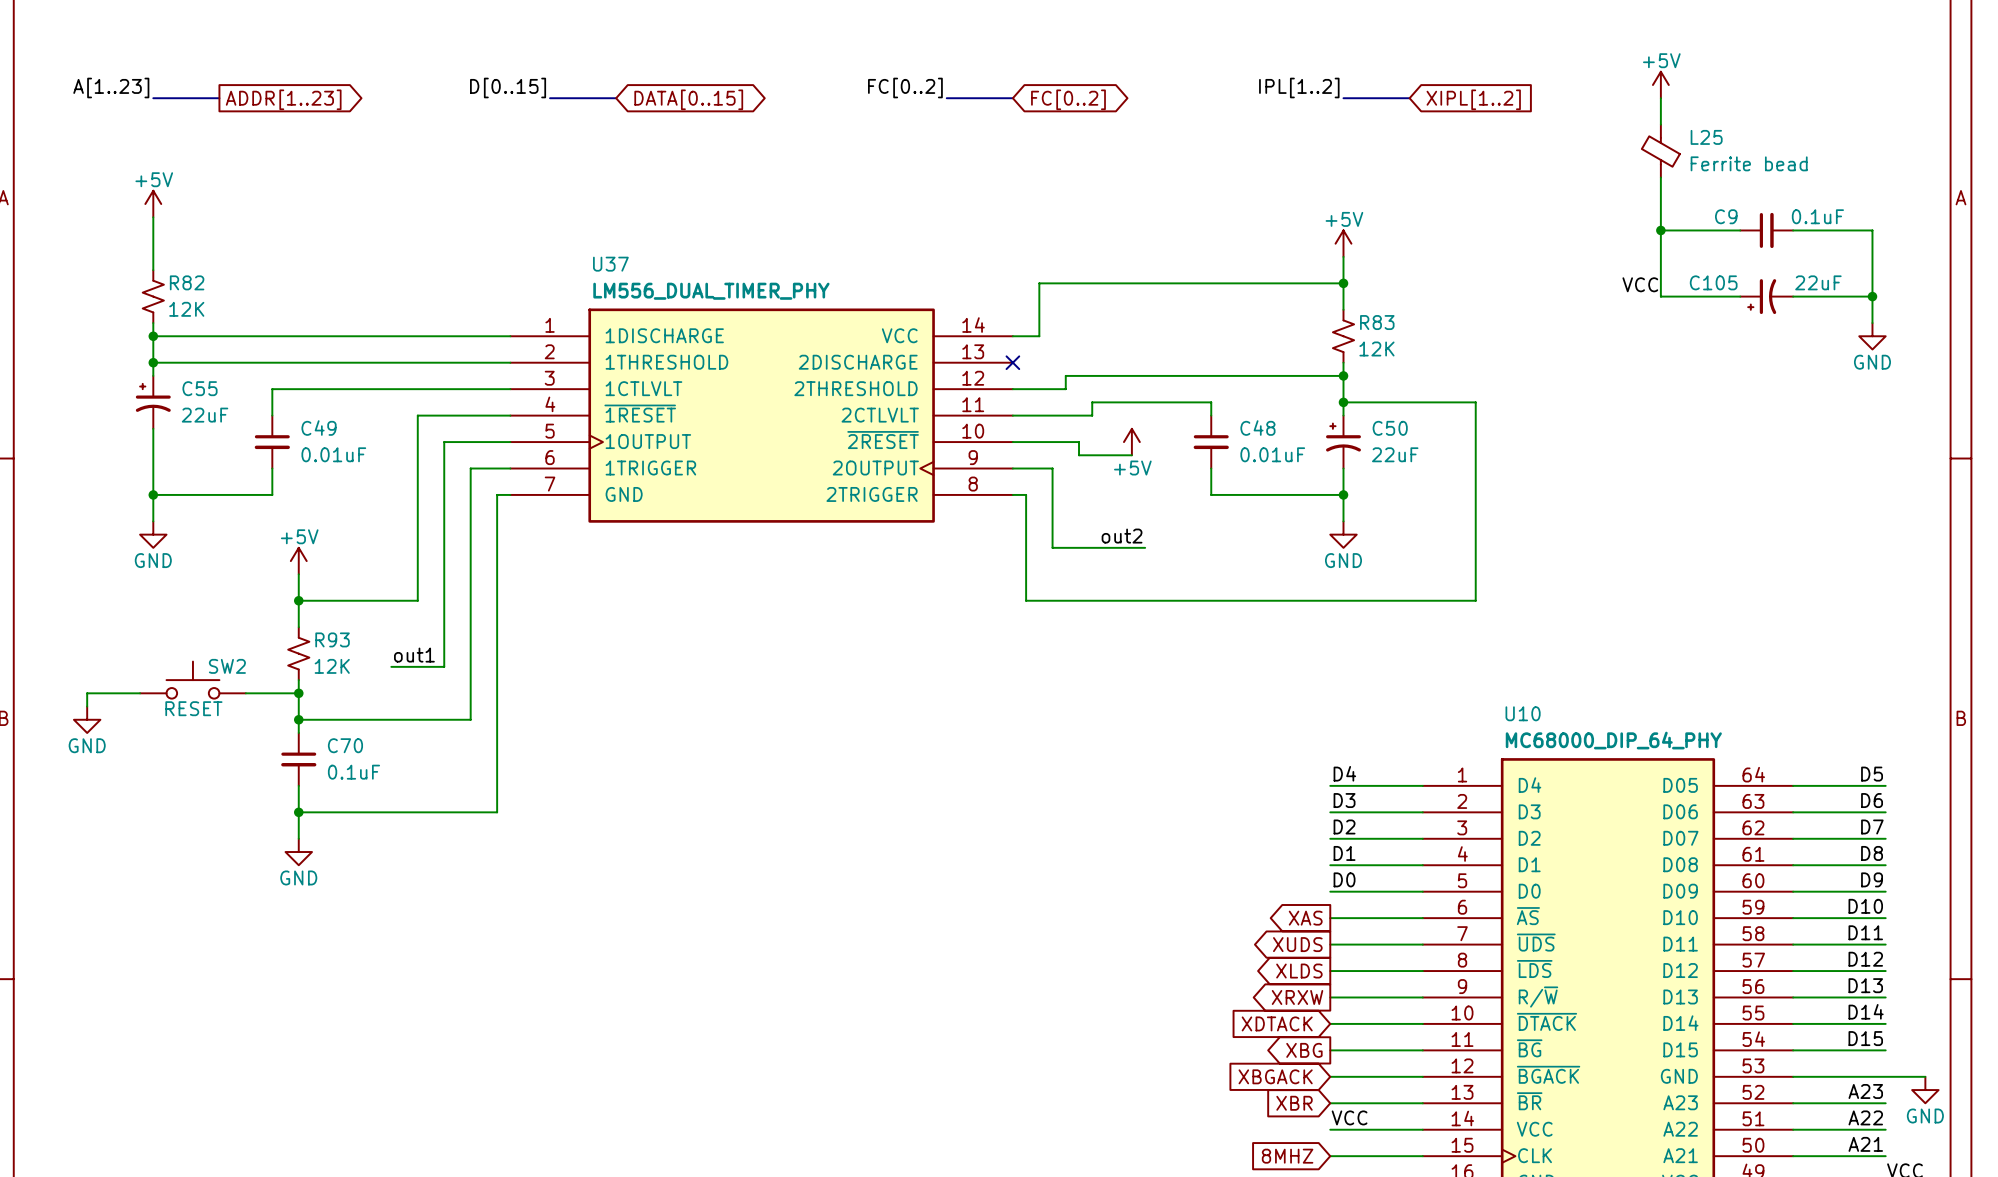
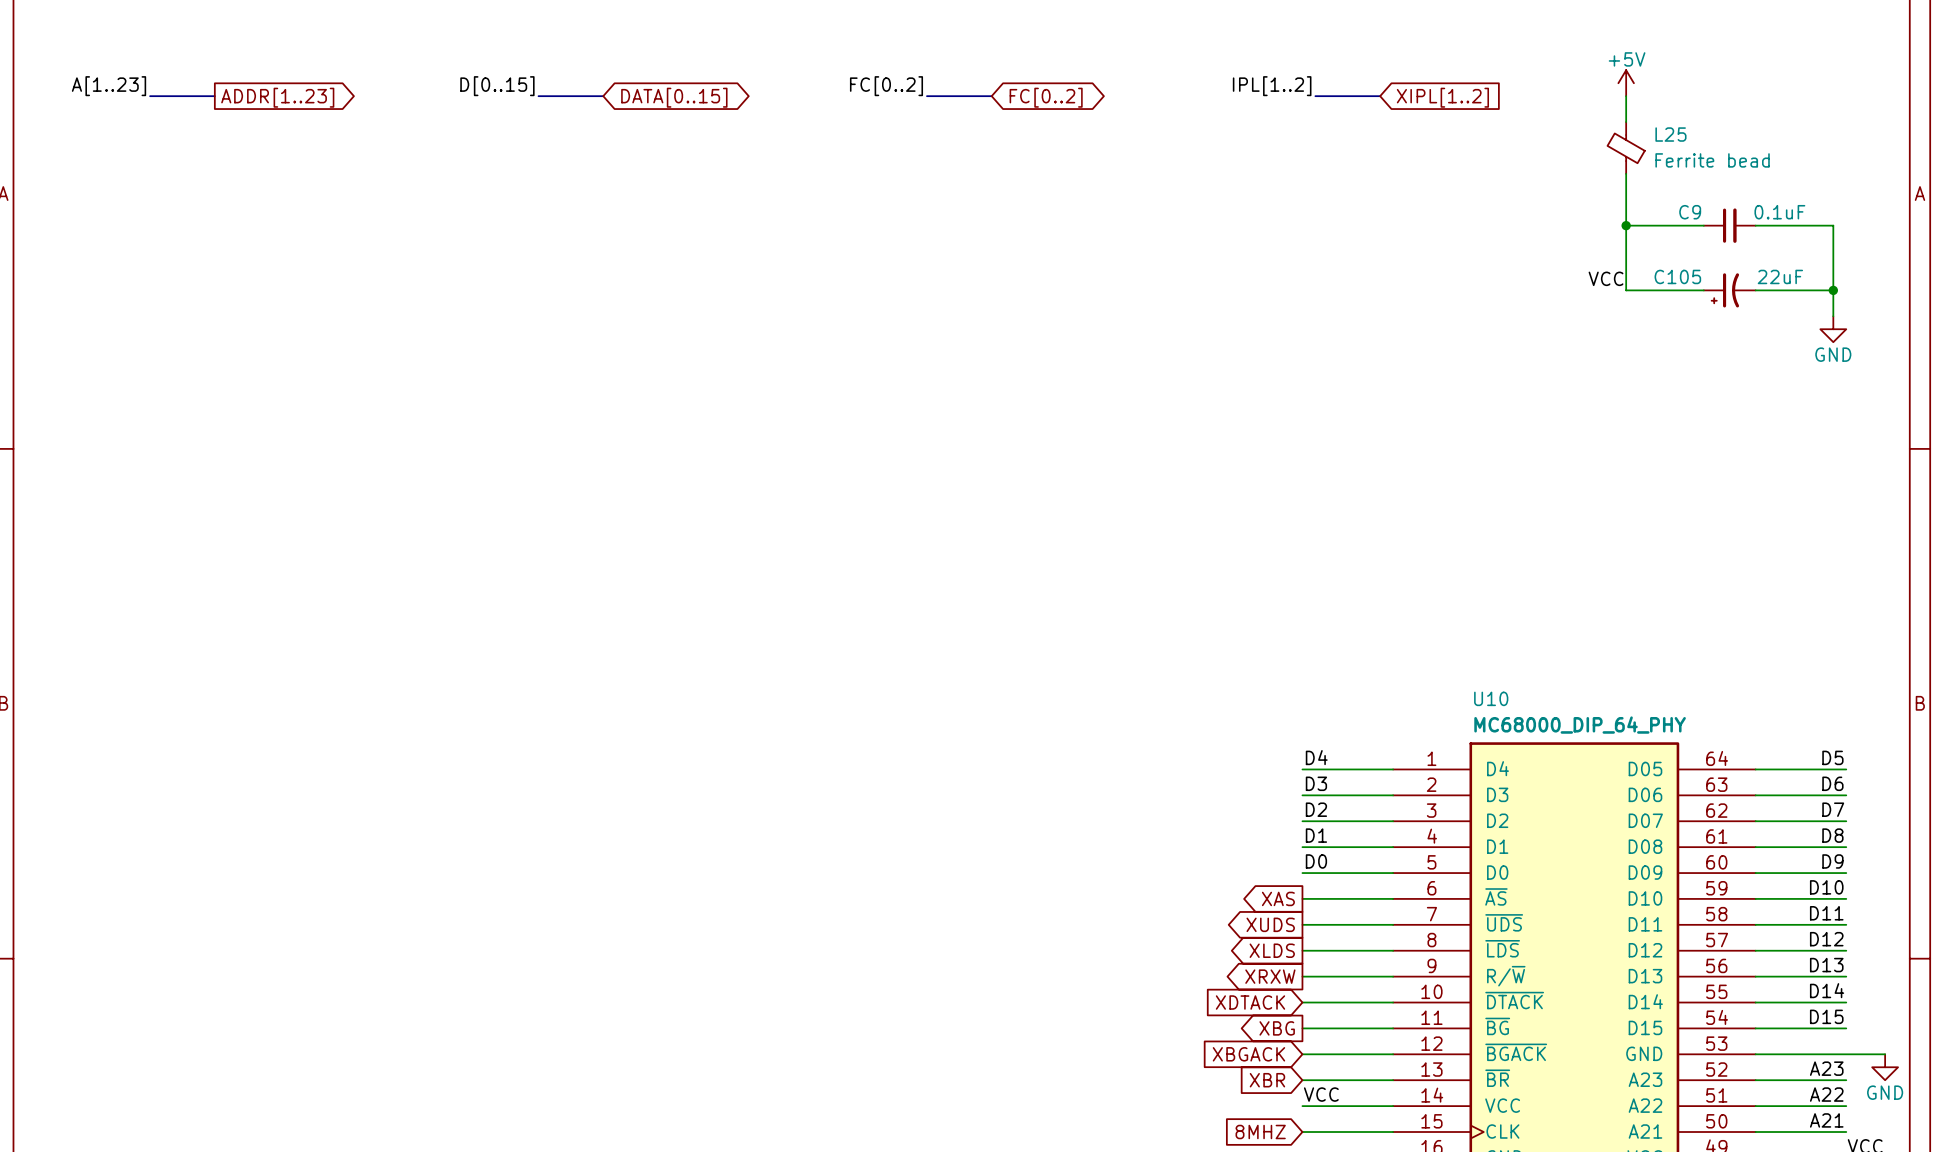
power symbol: +5V (153, 204) -> none
wire: (153, 217) (153, 270) -> none
power symbol: +5V (1343, 243) -> none
wire: (1343, 256) (1343, 309) -> none
wire: (1343, 283) (1039, 283) (1039, 336) (1012, 336) -> none
junction: (1343, 283) -> none
R82: 12K (153, 296) -> none
wire: (153, 323) (153, 375) -> none
wire: (153, 336) (510, 336) -> none
junction: (153, 336) -> none
R83: 12K (1343, 336) -> none
wire: (153, 362) (510, 362) -> none
junction: (153, 362) -> none
no-connect mark: (1012, 362) -> none
wire: (1343, 362) (1343, 415) -> none
wire: (1343, 375) (1065, 375) (1065, 389) (1012, 389) -> none
junction: (1343, 375) -> none
wire: (510, 389) (272, 389) (272, 415) -> none
C55: 22uF (153, 402) -> none
wire: (1343, 402) (1475, 402) (1475, 600) (1026, 600) (1026, 494) (1012, 494) -> none
junction: (1343, 402) -> none
wire: (510, 415) (417, 415) (417, 600) (298, 600) -> none
U37: LM556_DUAL_TIMER_PHY (761, 415) -> none
wire: (1012, 415) (1092, 415) (1092, 402) (1211, 402) (1211, 415) -> none
wire: (153, 428) (153, 521) -> none
C49: 0.01uF (272, 442) -> none
wire: (510, 442) (444, 442) (444, 666) (391, 666) -> none
wire: (1012, 442) (1079, 442) (1079, 455) (1131, 455) -> none
power symbol: +5V (1131, 442) -> none
C48: 0.01uF (1211, 442) -> none
C50: 22uF (1343, 442) -> none
wire: (272, 468) (272, 494) (153, 494) -> none
wire: (510, 468) (470, 468) (470, 719) (298, 719) -> none
wire: (1012, 468) (1052, 468) (1052, 547) (1145, 547) -> none
wire: (1211, 468) (1211, 494) (1343, 494) -> none
wire: (1343, 468) (1343, 521) -> none
junction: (153, 494) -> none
wire: (510, 494) (497, 494) (497, 812) (298, 812) -> none
junction: (1343, 494) -> none
power symbol: GND (153, 534) -> none
power symbol: GND (1343, 534) -> none
label: out2 (1122, 536) -> none
power symbol: +5V (298, 561) -> none
wire: (298, 574) (298, 627) -> none
junction: (298, 600) -> none
R93: 12K (298, 653) -> none
label: out1 (414, 655) -> none
SW2: RESET (192, 680) -> none
wire: (298, 680) (298, 732) -> none
wire: (140, 693) (87, 693) (87, 706) -> none
wire: (245, 693) (298, 693) -> none
junction: (298, 693) -> none
power symbol: GND (87, 719) -> none
junction: (298, 719) -> none
C70: 0.1uF (298, 759) -> none
wire: (298, 785) (298, 838) -> none
junction: (298, 812) -> none
power symbol: GND (298, 852) -> none

